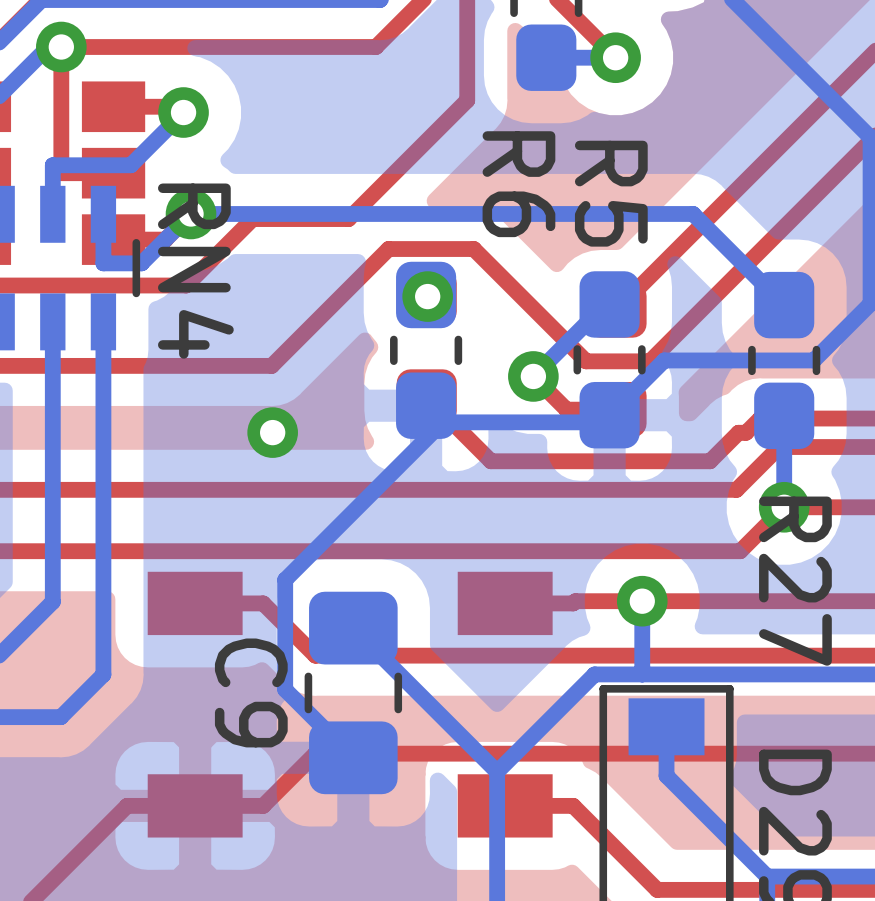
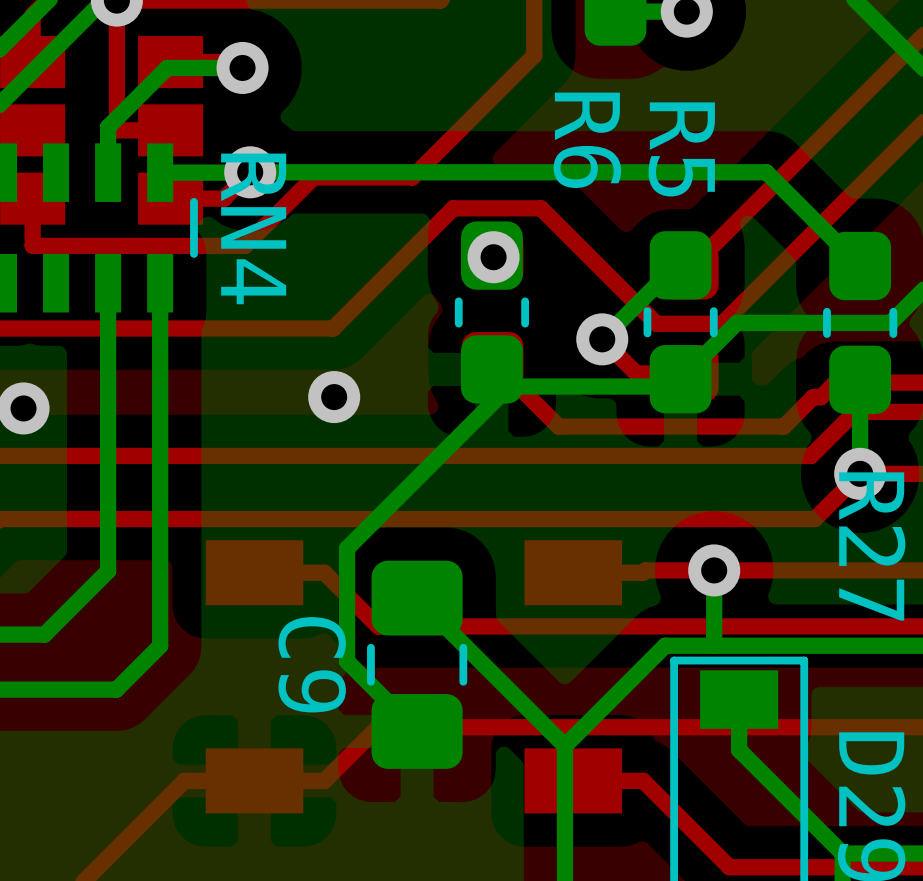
bottom track: (183, 112) (130, 165) (52, 165) (52, 170) -> (242, 67) (167, 67) (108, 127)
bottom track: (190, 214) (141, 263) (103, 263) (103, 214) -> (249, 172) (160, 172)

